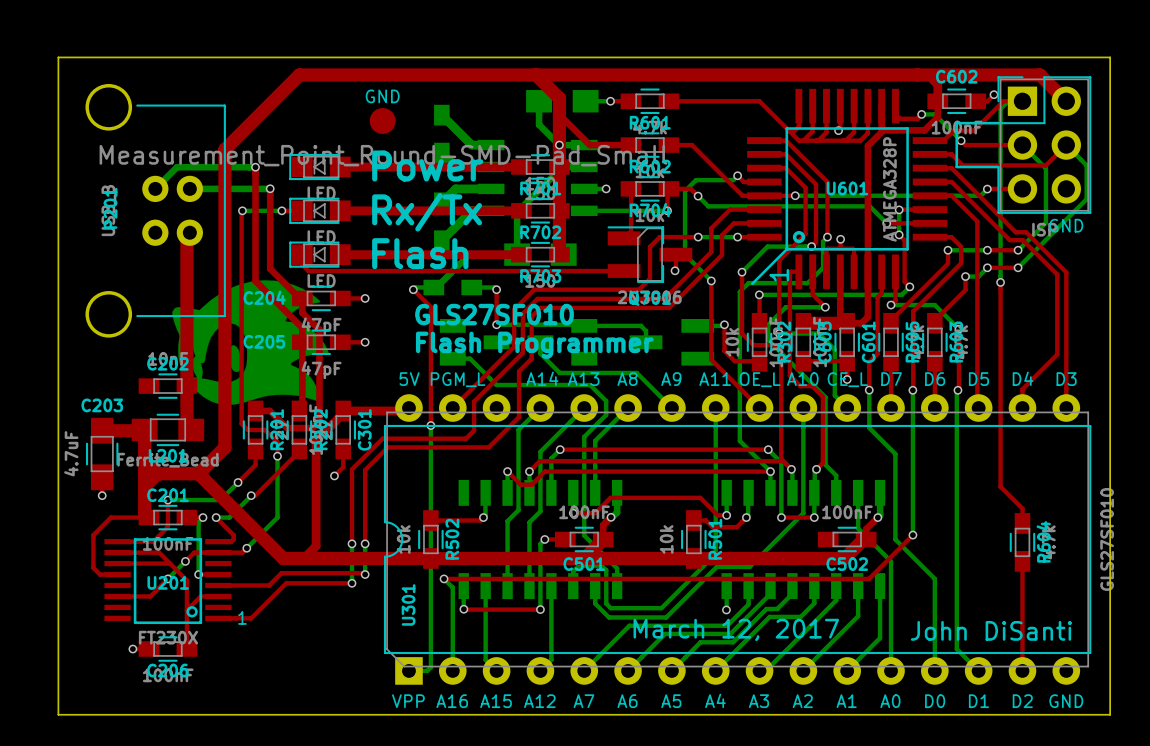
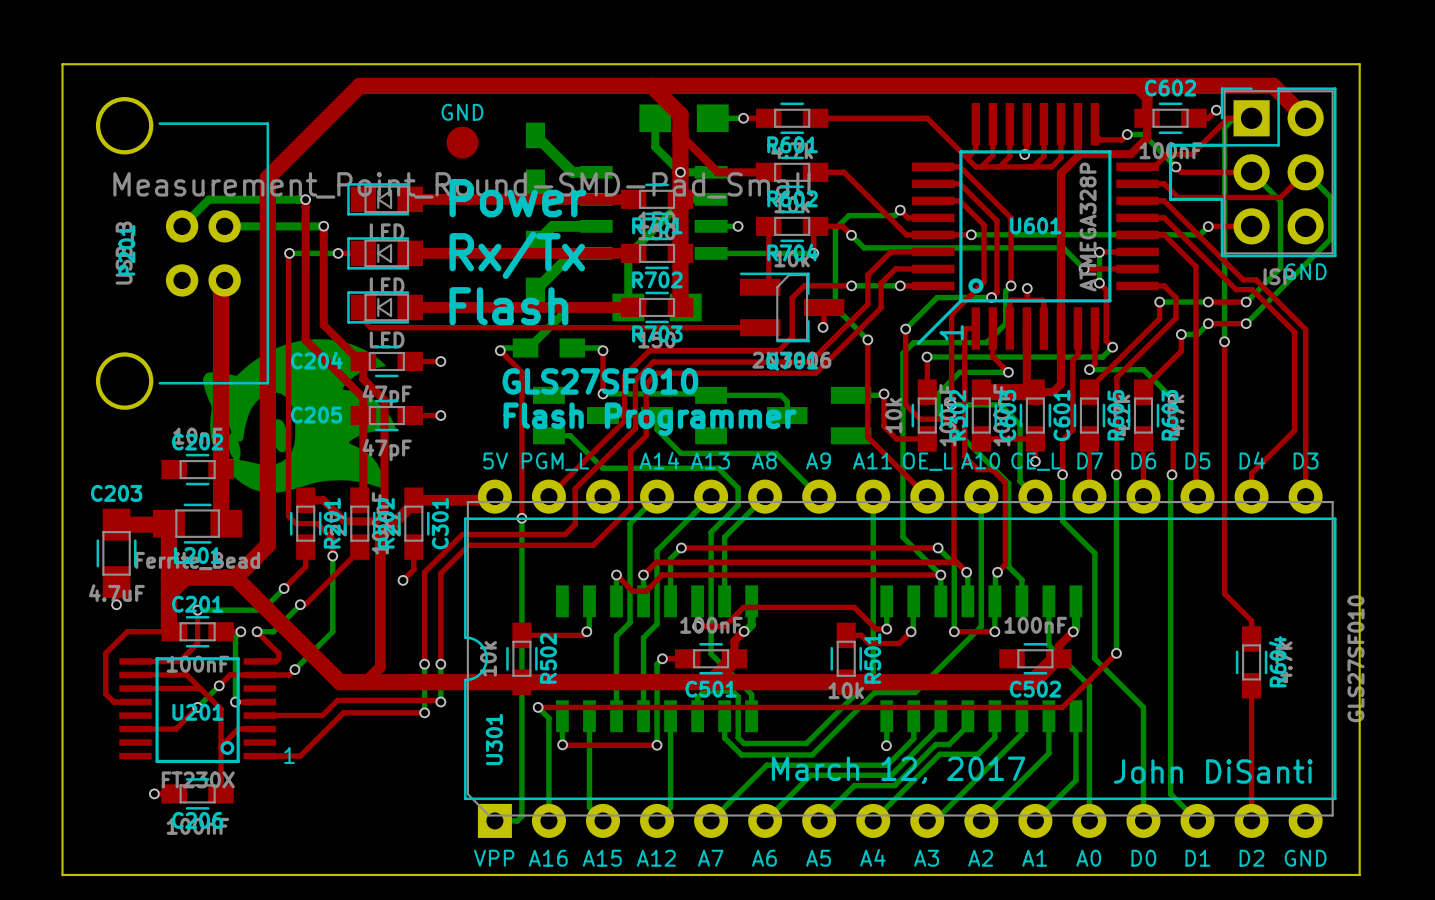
C203 value rotation: 0° (71, 453) -> 90° clockwise (116, 593)
R501 value rotation: 0° (666, 539) -> 90° clockwise (846, 690)
R501 value position: 10k (666, 539) -> 10k (846, 690)

